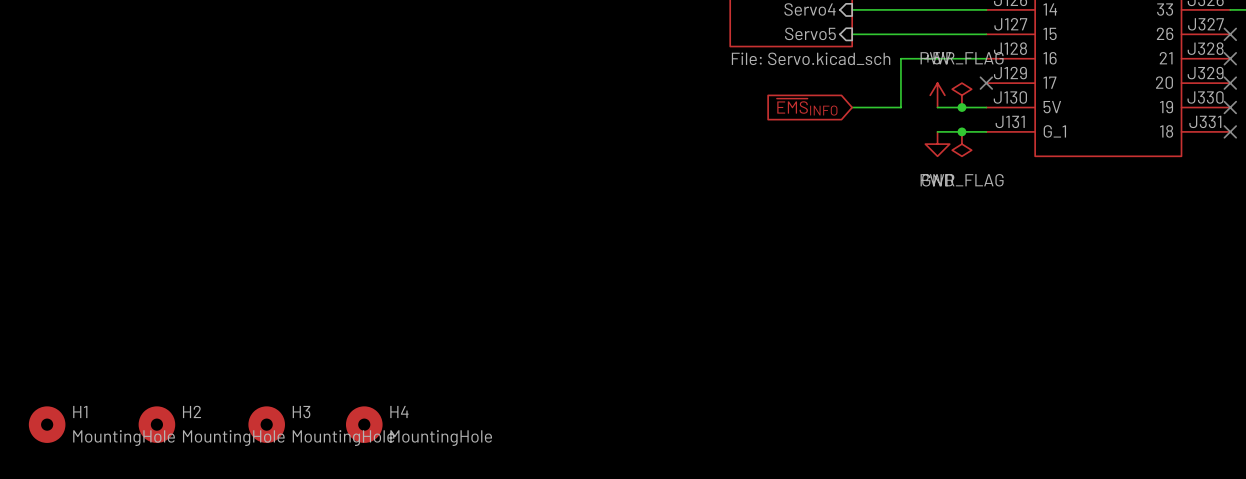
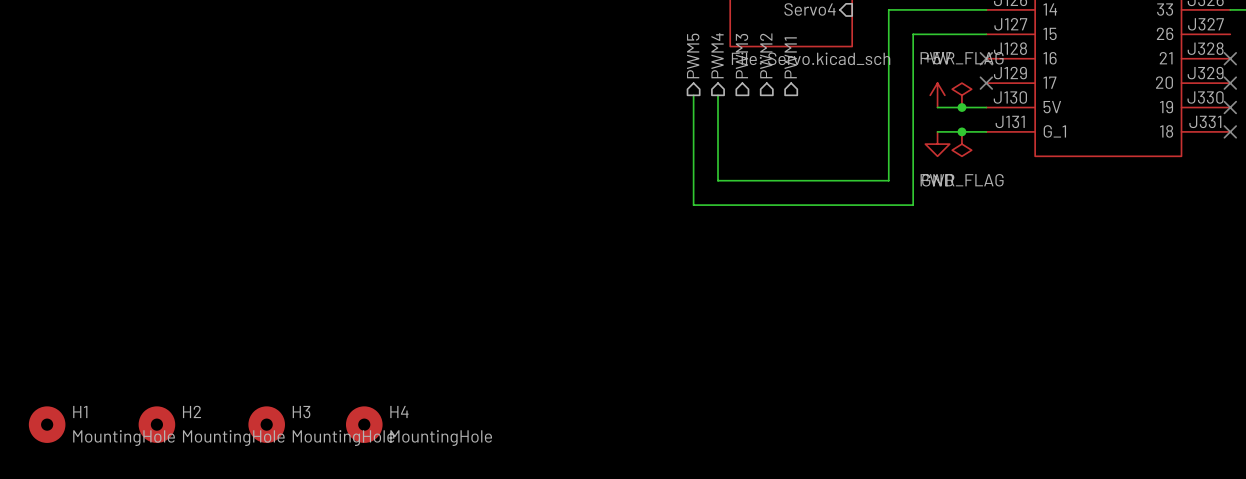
wire: (852, 9) (888, 9) -> (718, 95) (718, 180) (888, 180) (888, 9)
sheet pin: Servo5 (810, 33) -> none
wire: (852, 34) (913, 34) -> (693, 95) (693, 205) (913, 205) (913, 34)
no-connect mark: (1230, 34) -> none
sheet pin: none -> PWM5 (693, 55)
sheet pin: none -> PWM4 (717, 55)
sheet pin: none -> PWM2 (766, 55)
sheet pin: none -> PWM3 (742, 56)
sheet pin: none -> PWM1 (790, 57)
wire: (986, 58) (900, 58) (900, 107) (852, 107) -> none
no-connect mark: none -> (986, 58)
global label: ~{EMS}INFO (807, 107) -> none

